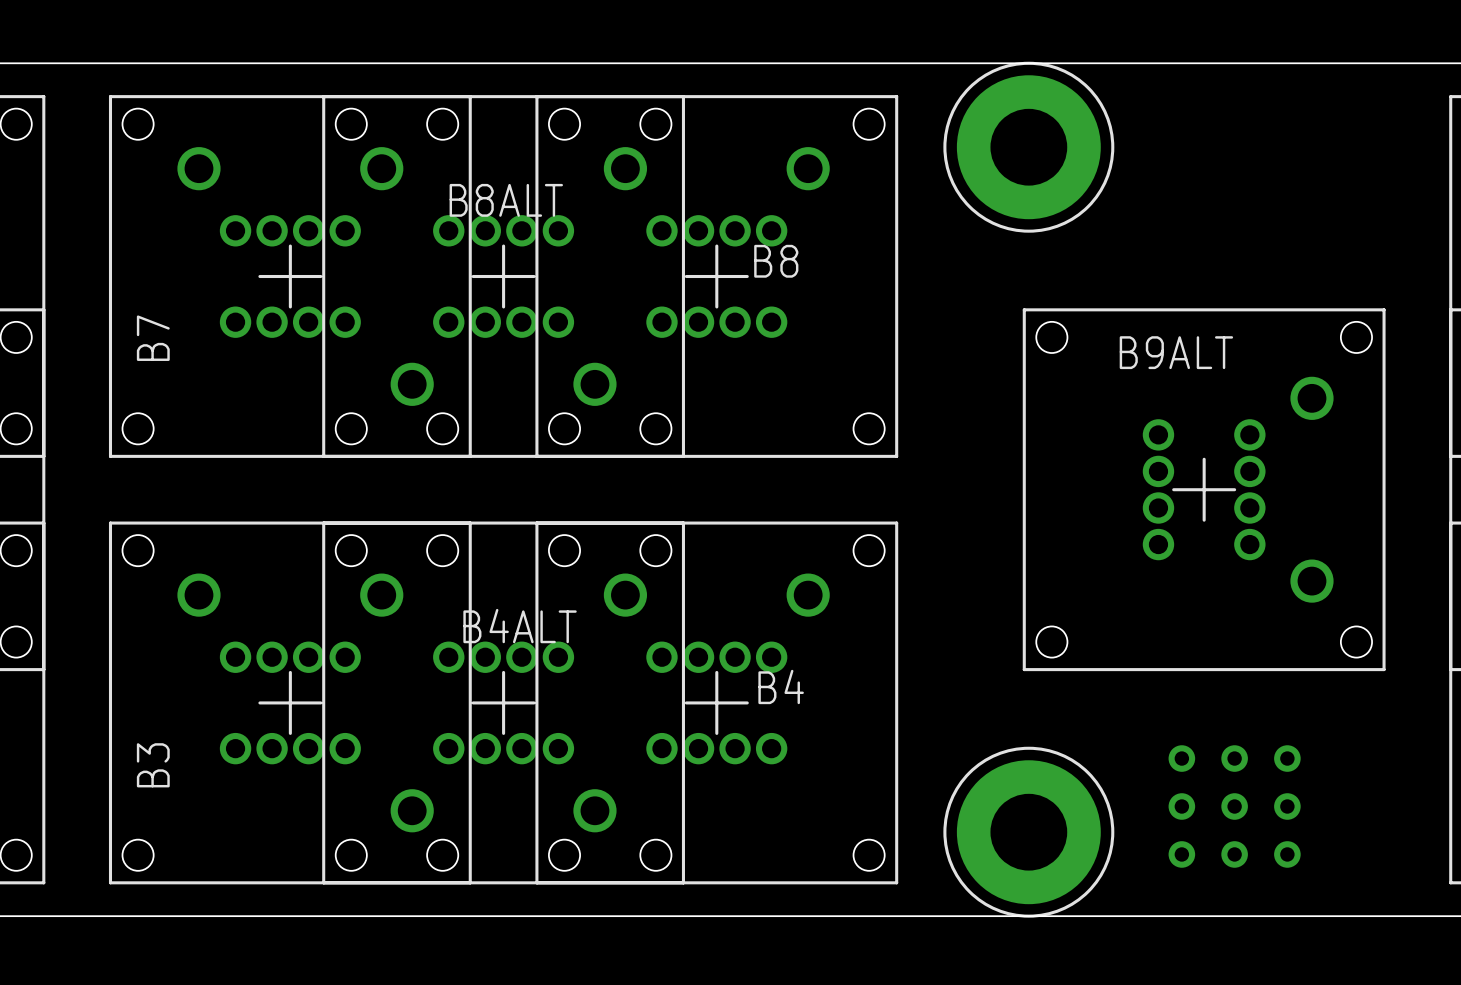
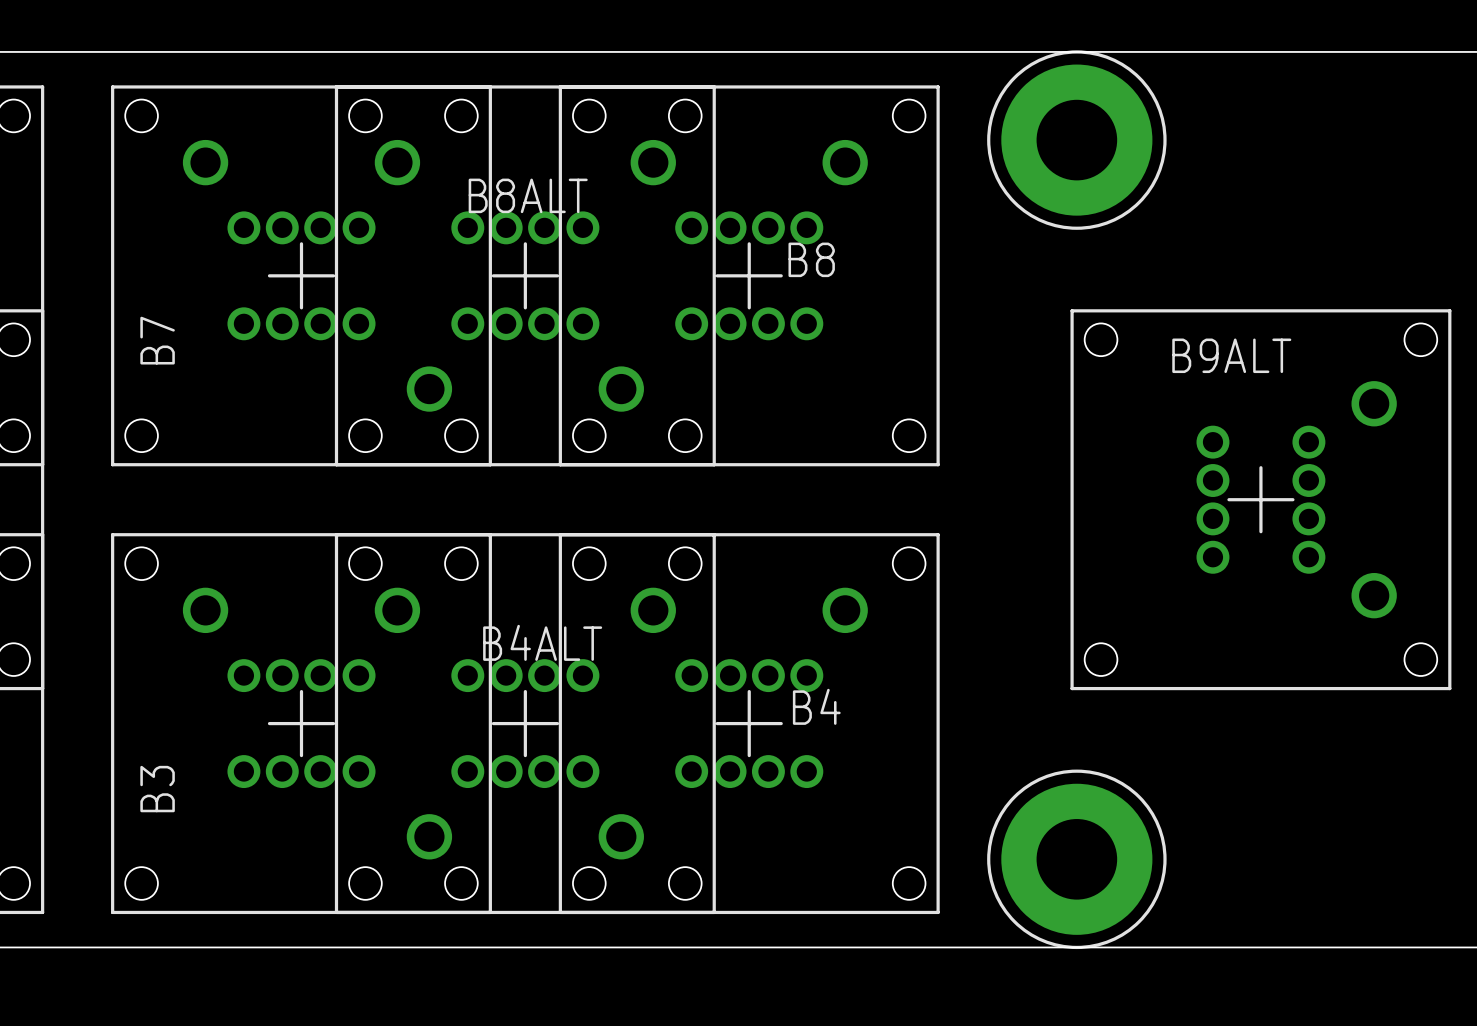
part: (1234, 806) -> none

